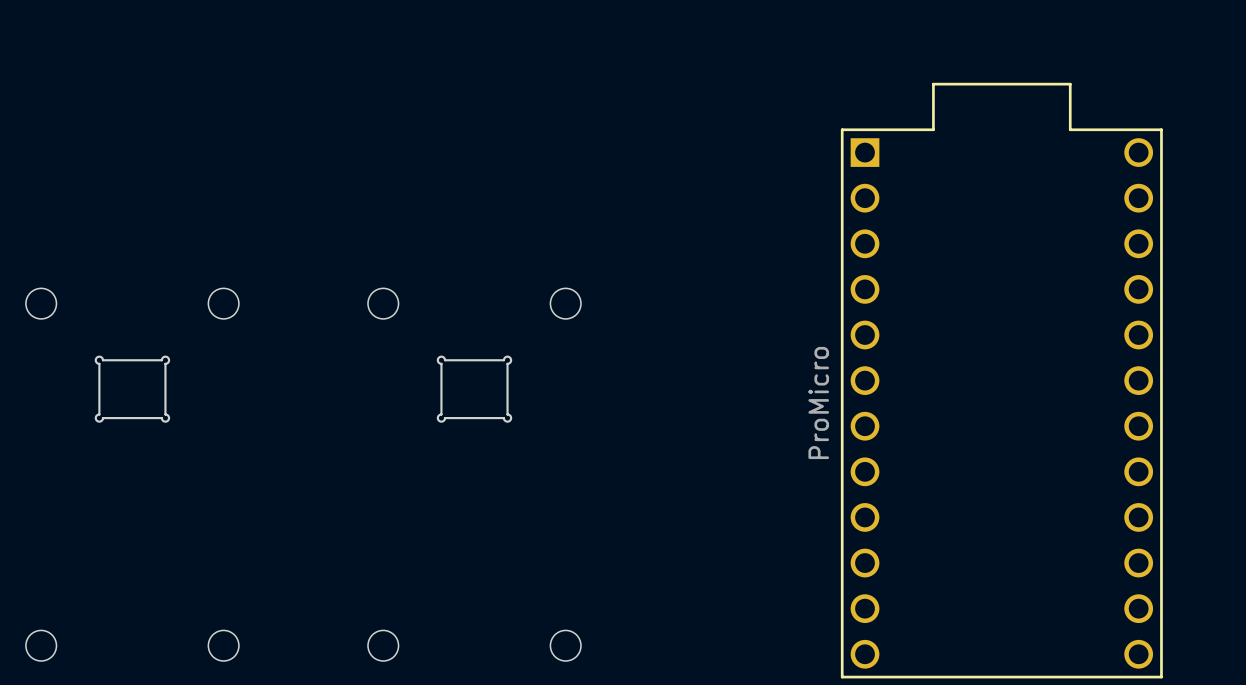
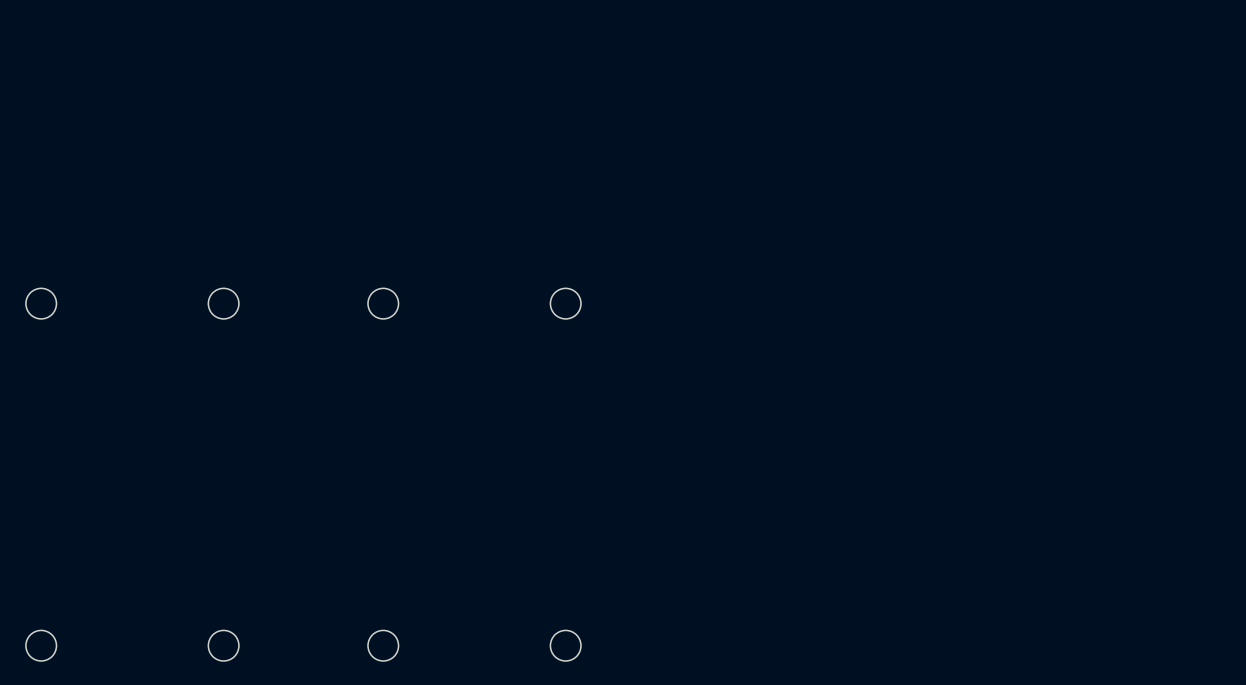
part: ProMicro (1001, 380) -> none
part: (132, 389) -> none
part: (474, 389) -> none

